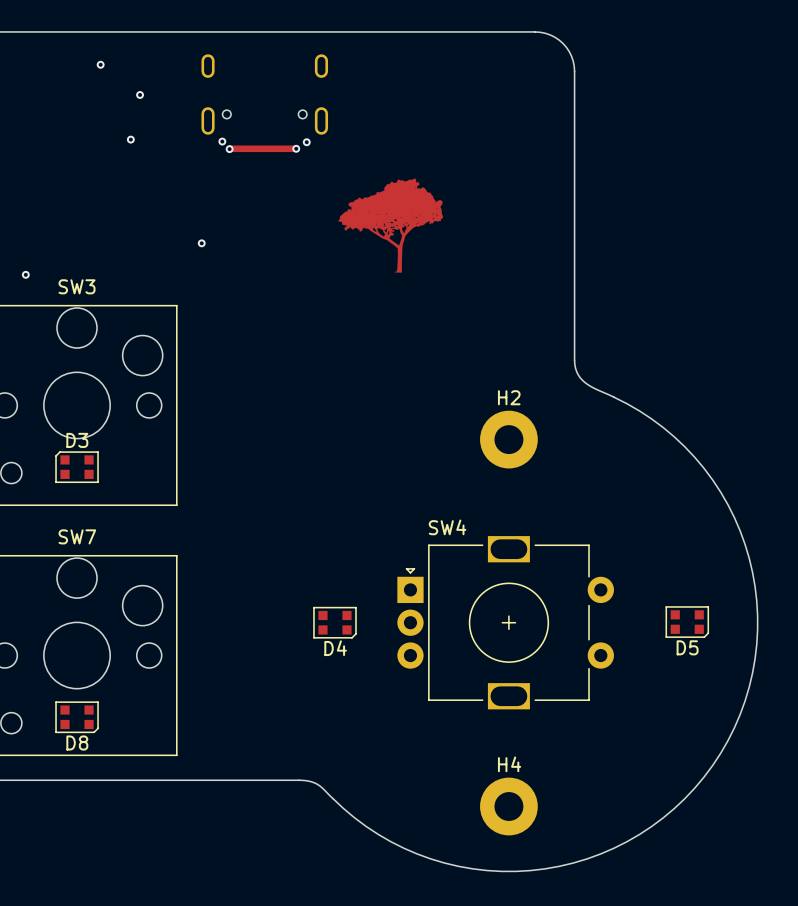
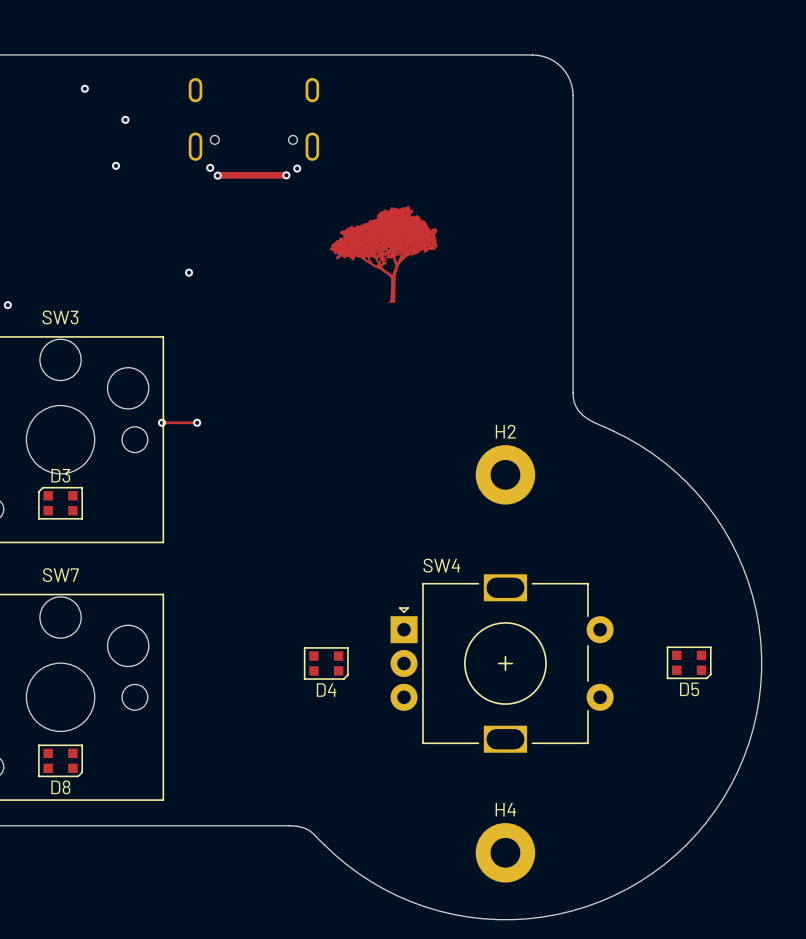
track: none -> (161, 422) (197, 422)
via: none -> (161, 422)
via: none -> (197, 422)

